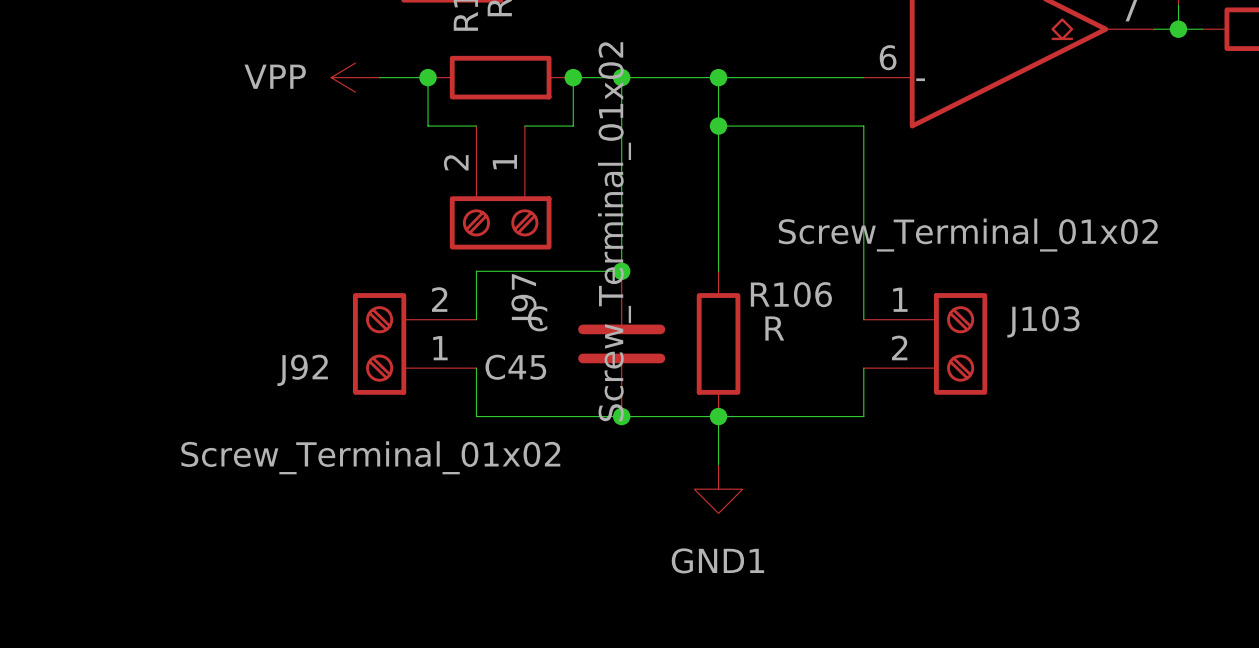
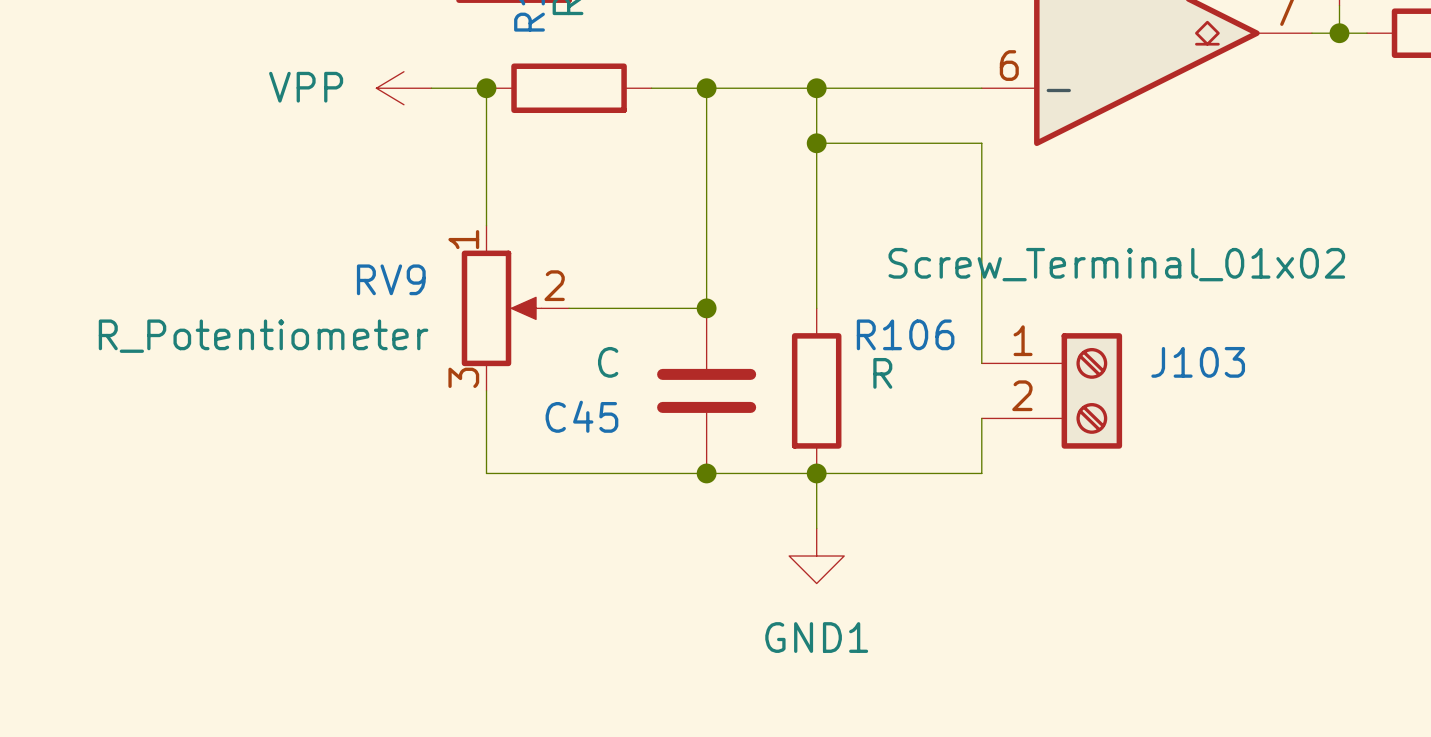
wire: (573, 77) (573, 126) (524, 126) -> none
junction: (573, 77) -> none
wire: (428, 126) (476, 126) -> (486, 143) (486, 225)
J97: Screw_Terminal_01x02 (500, 187) -> none
RV9: none -> R_Potentiometer (515, 308)
wire: (500, 271) (476, 271) (476, 319) -> none
J92: Screw_Terminal_01x02 (414, 343) -> none
wire: (476, 368) (476, 416) -> (486, 390) (486, 473) (541, 473)

